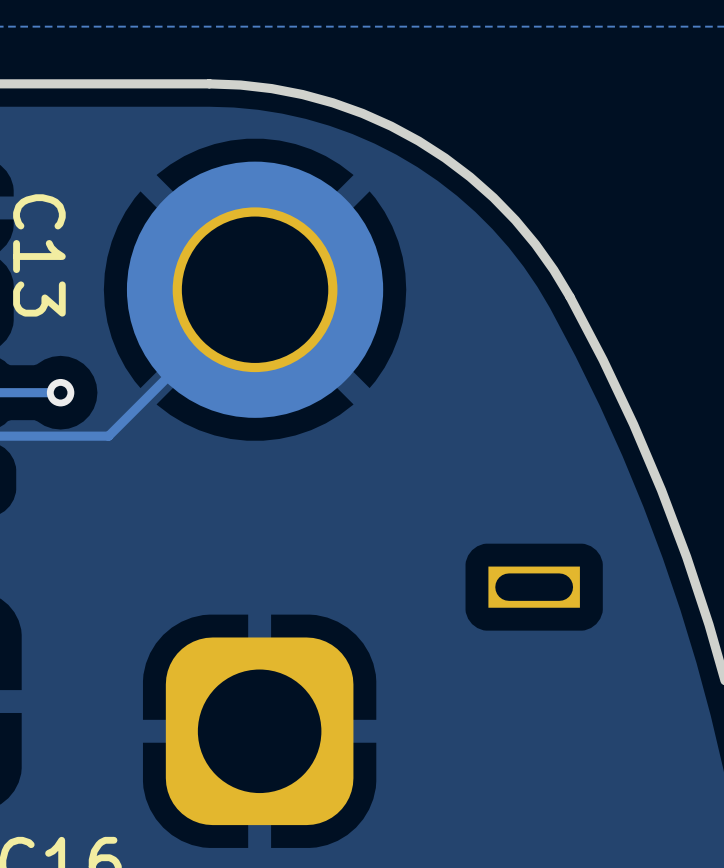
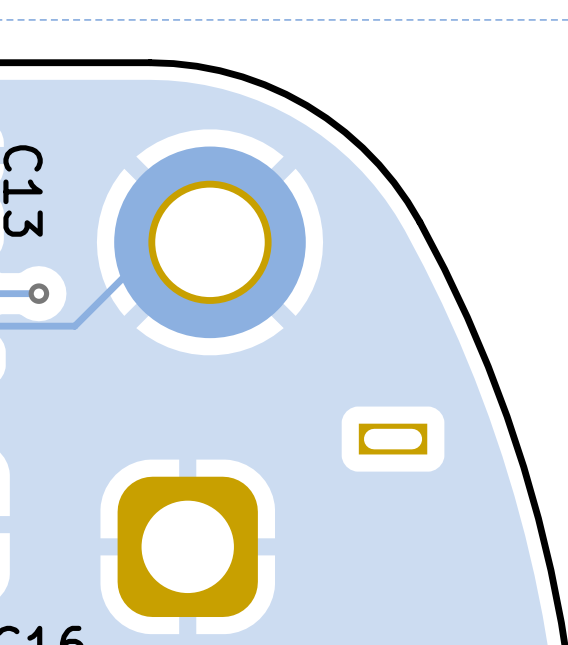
part position: (255, 289) -> (209, 242)

